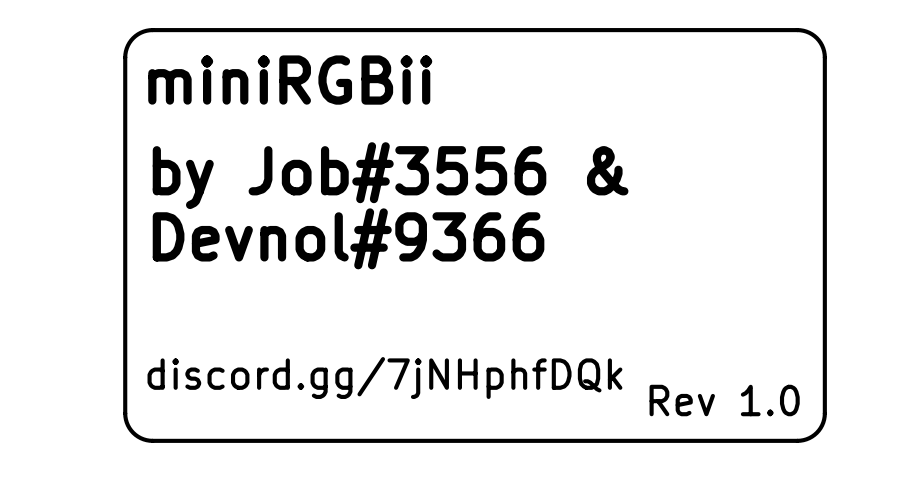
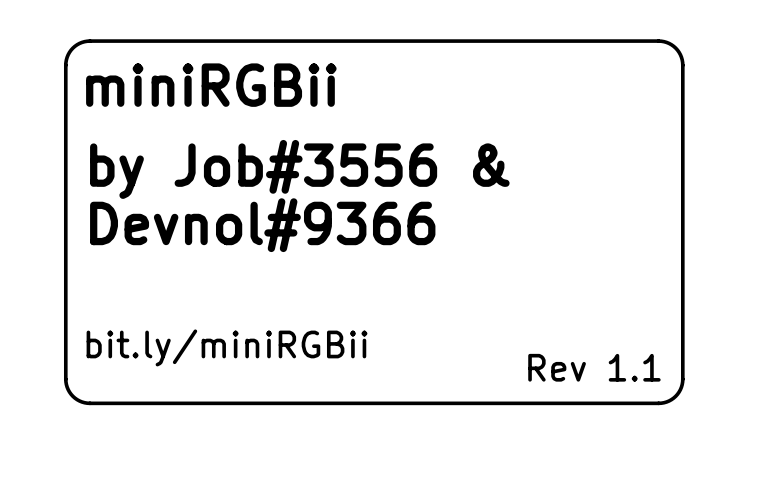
text: discord.gg/7jNHphfDQk (384, 378) -> bit.ly/miniRGBii (227, 347)
text: Rev 1.0 (724, 400) -> Rev 1.1 (594, 367)

